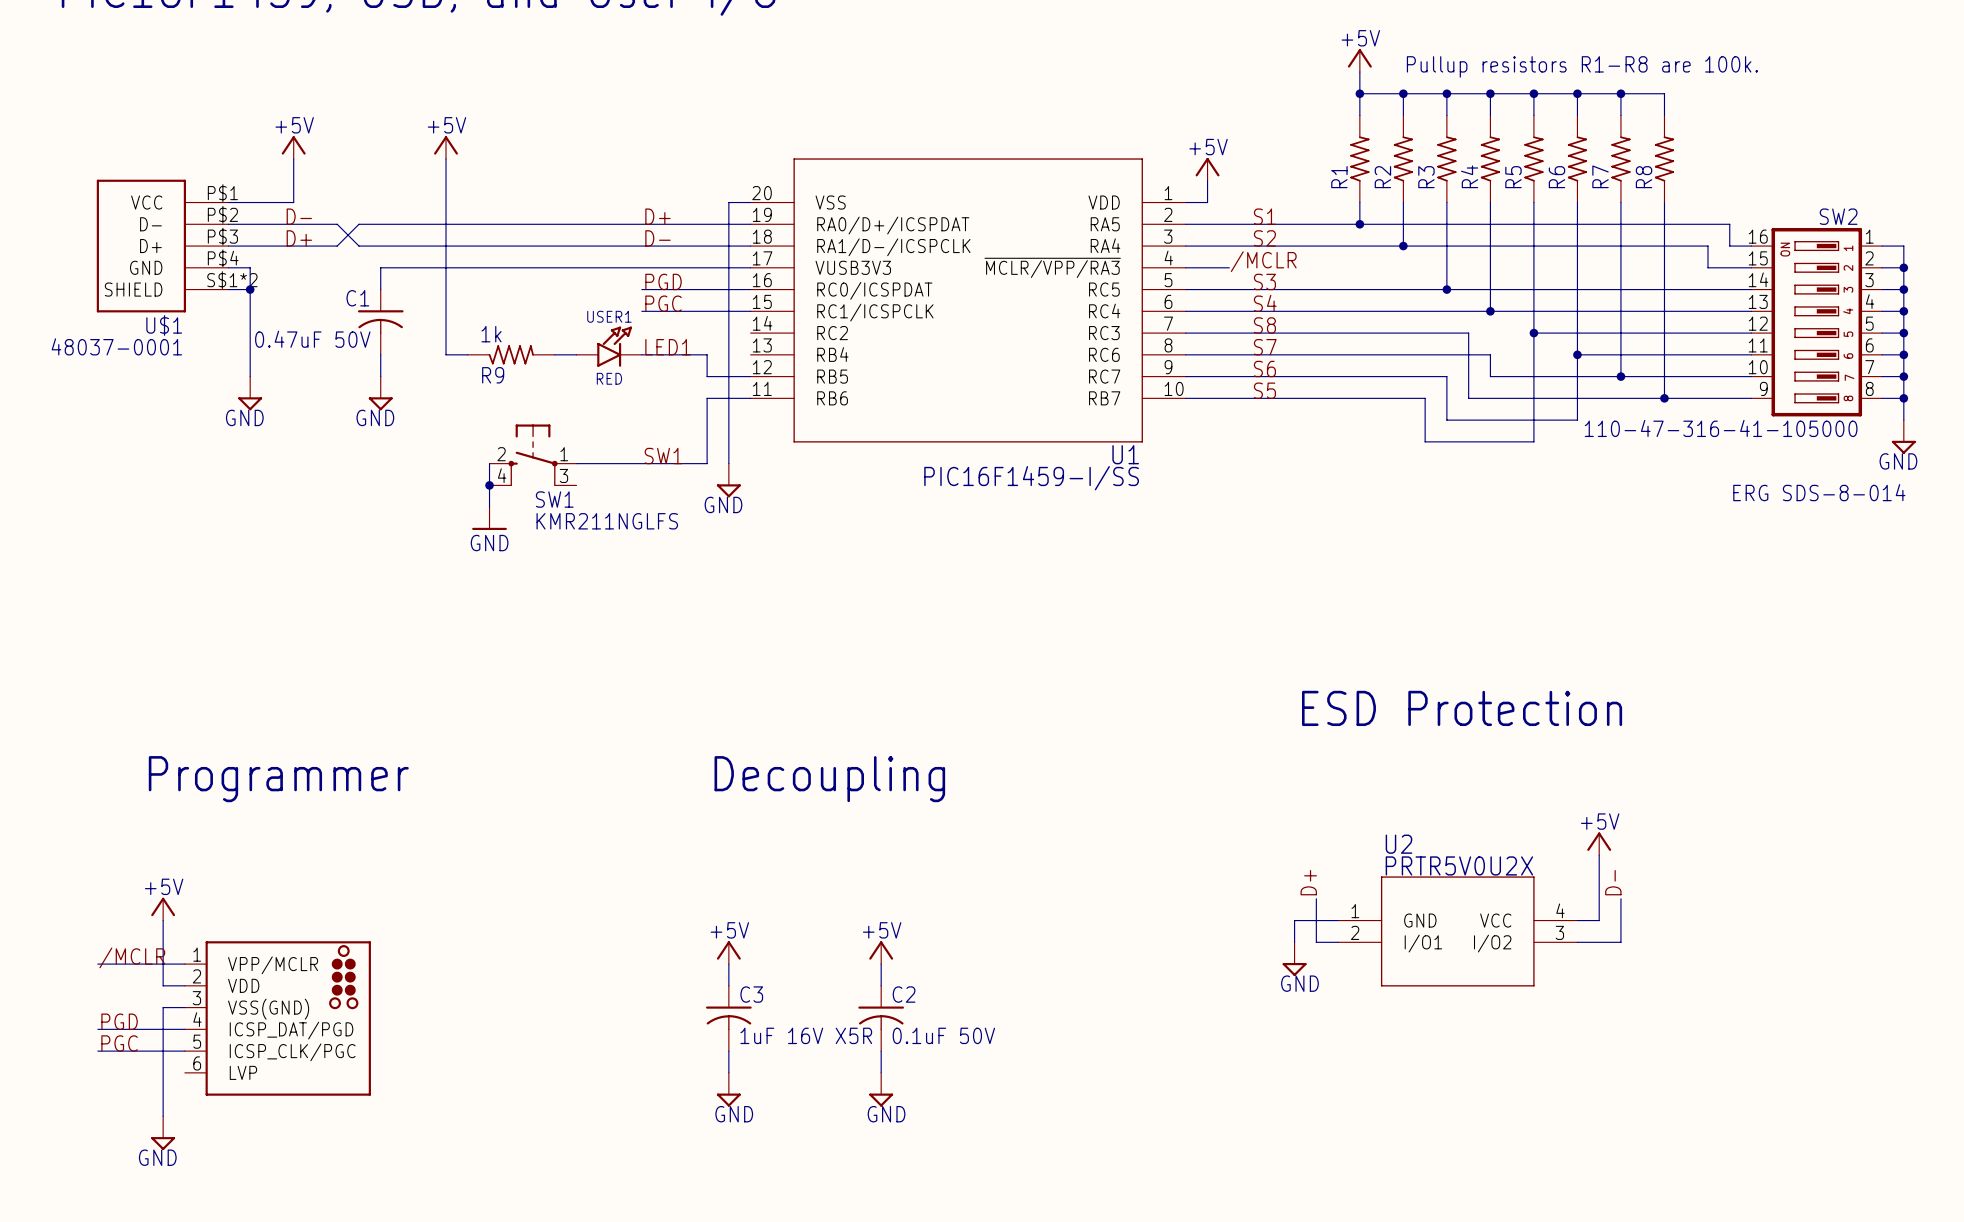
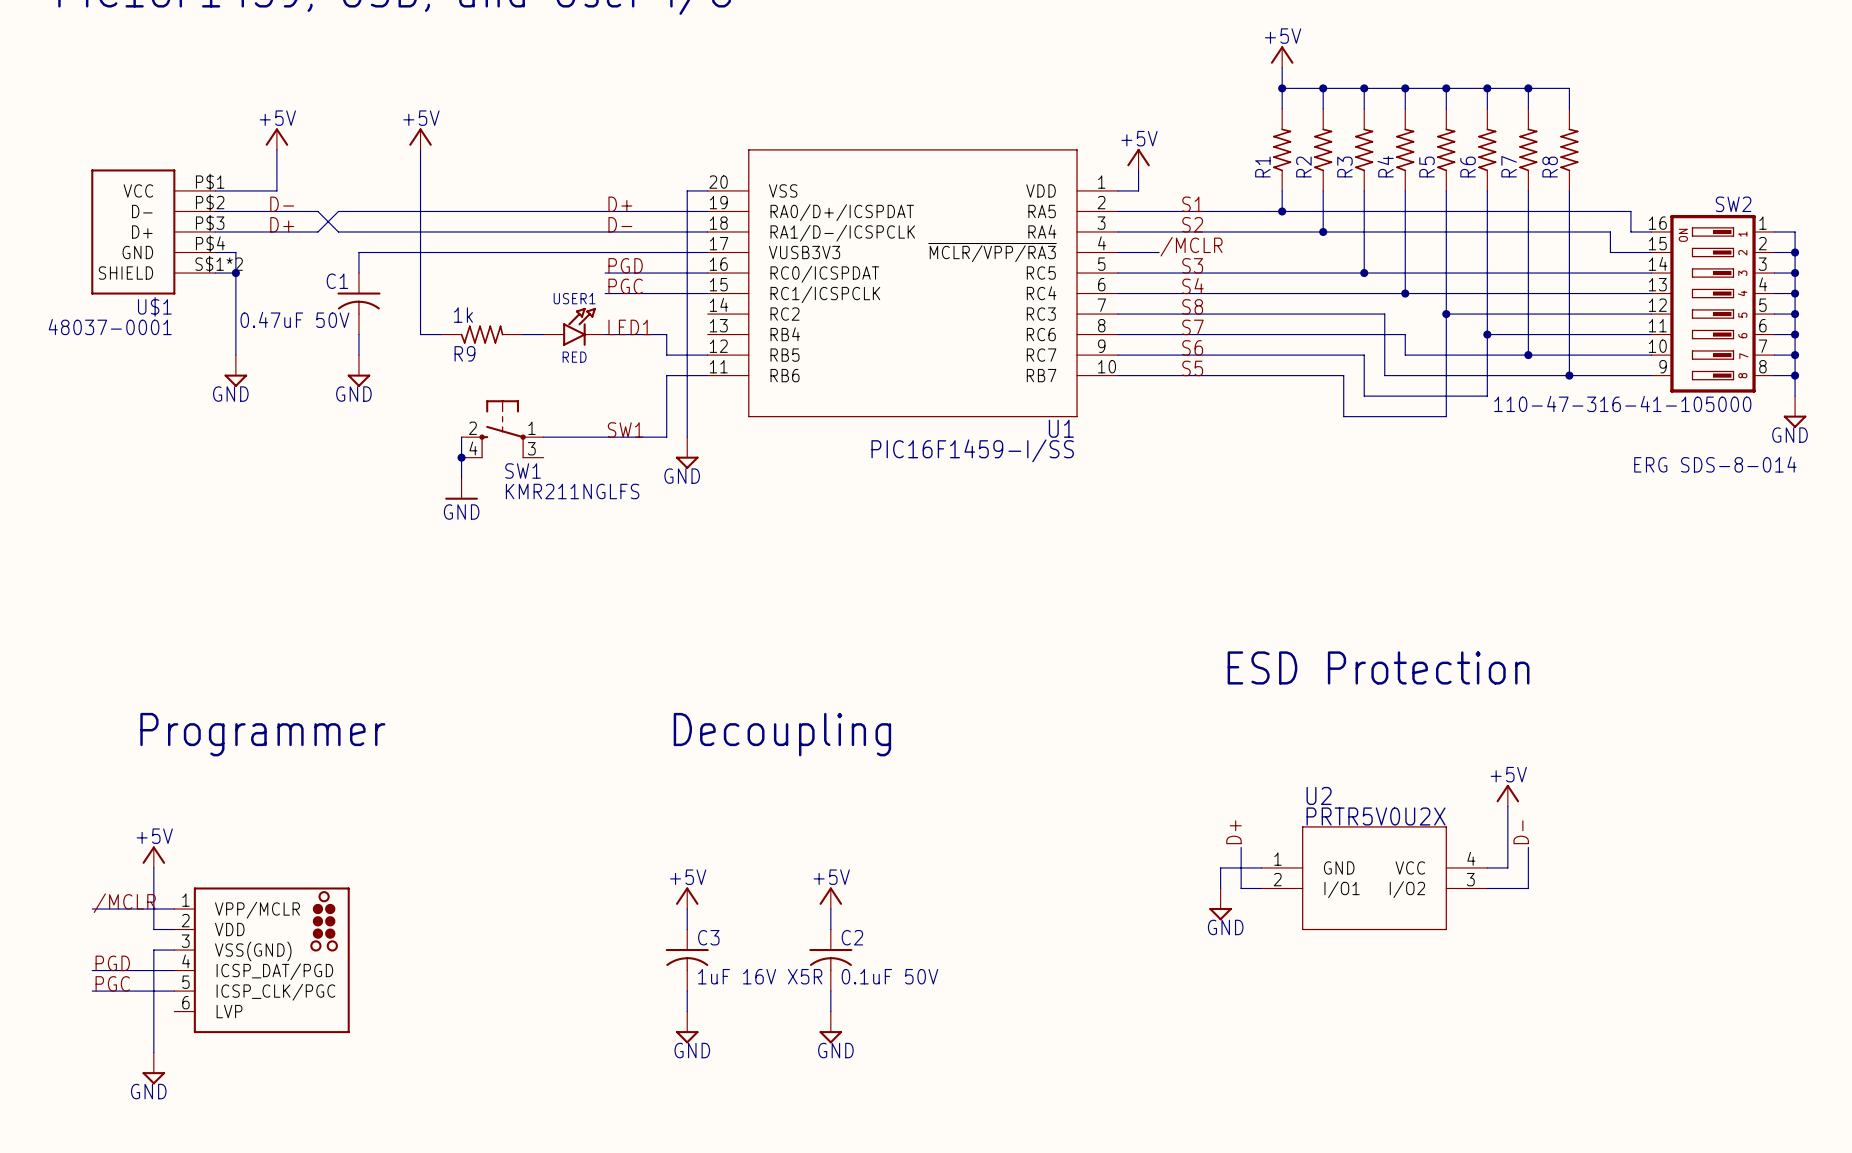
text: Pullup resistors R1-R8 are 100k. (1582, 66) -> none

